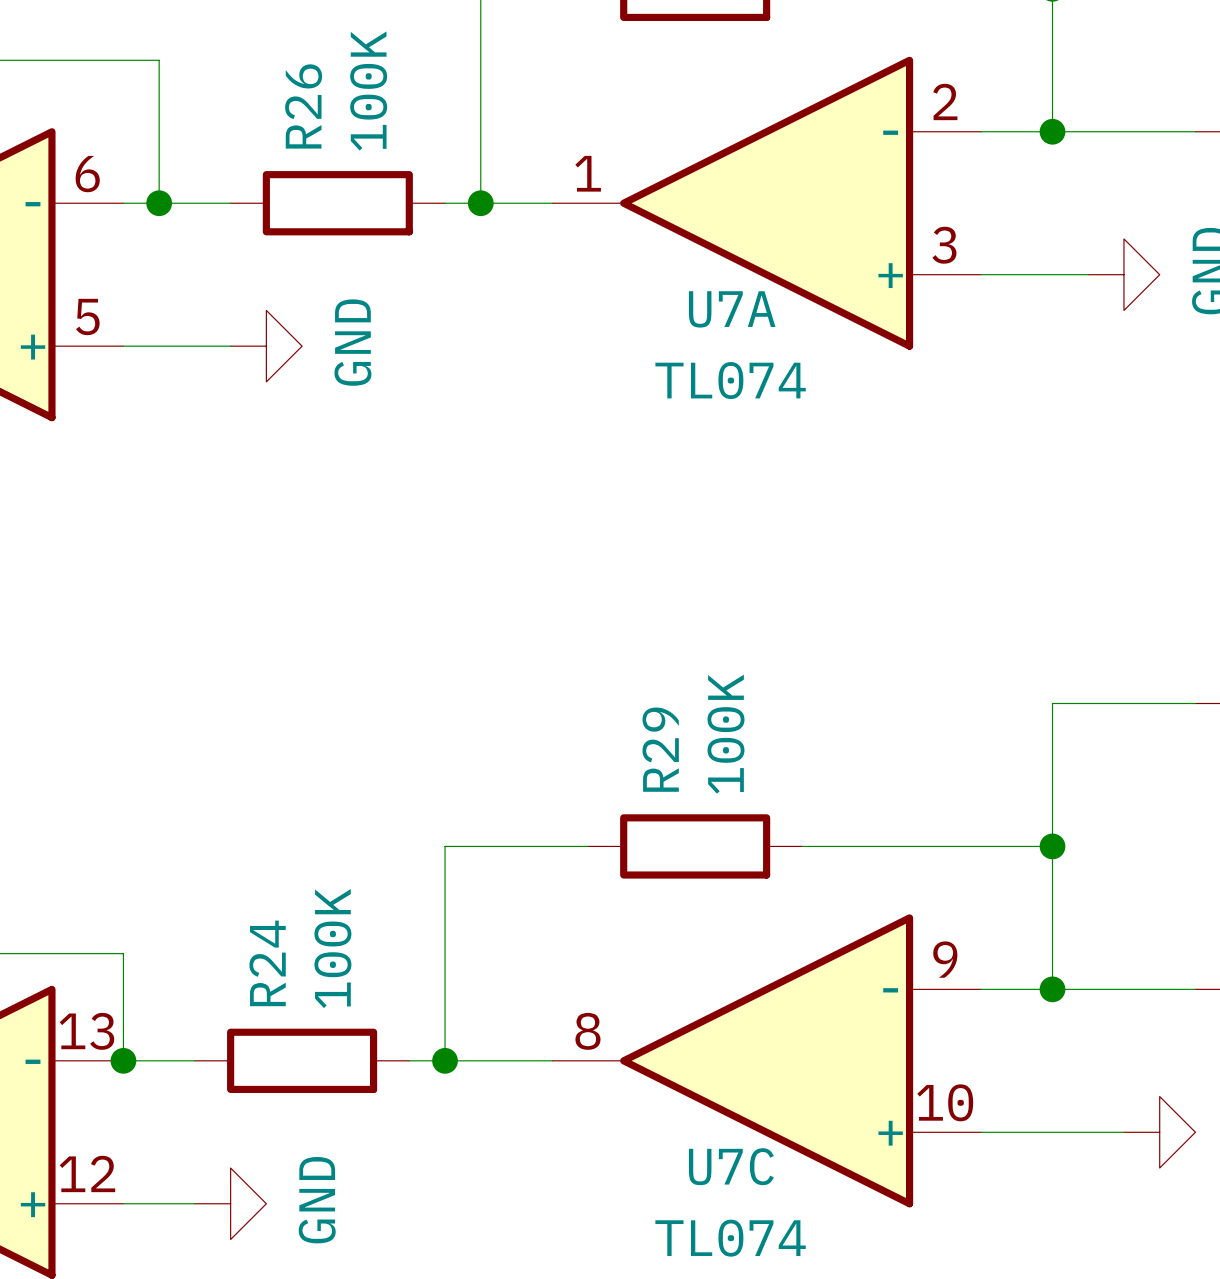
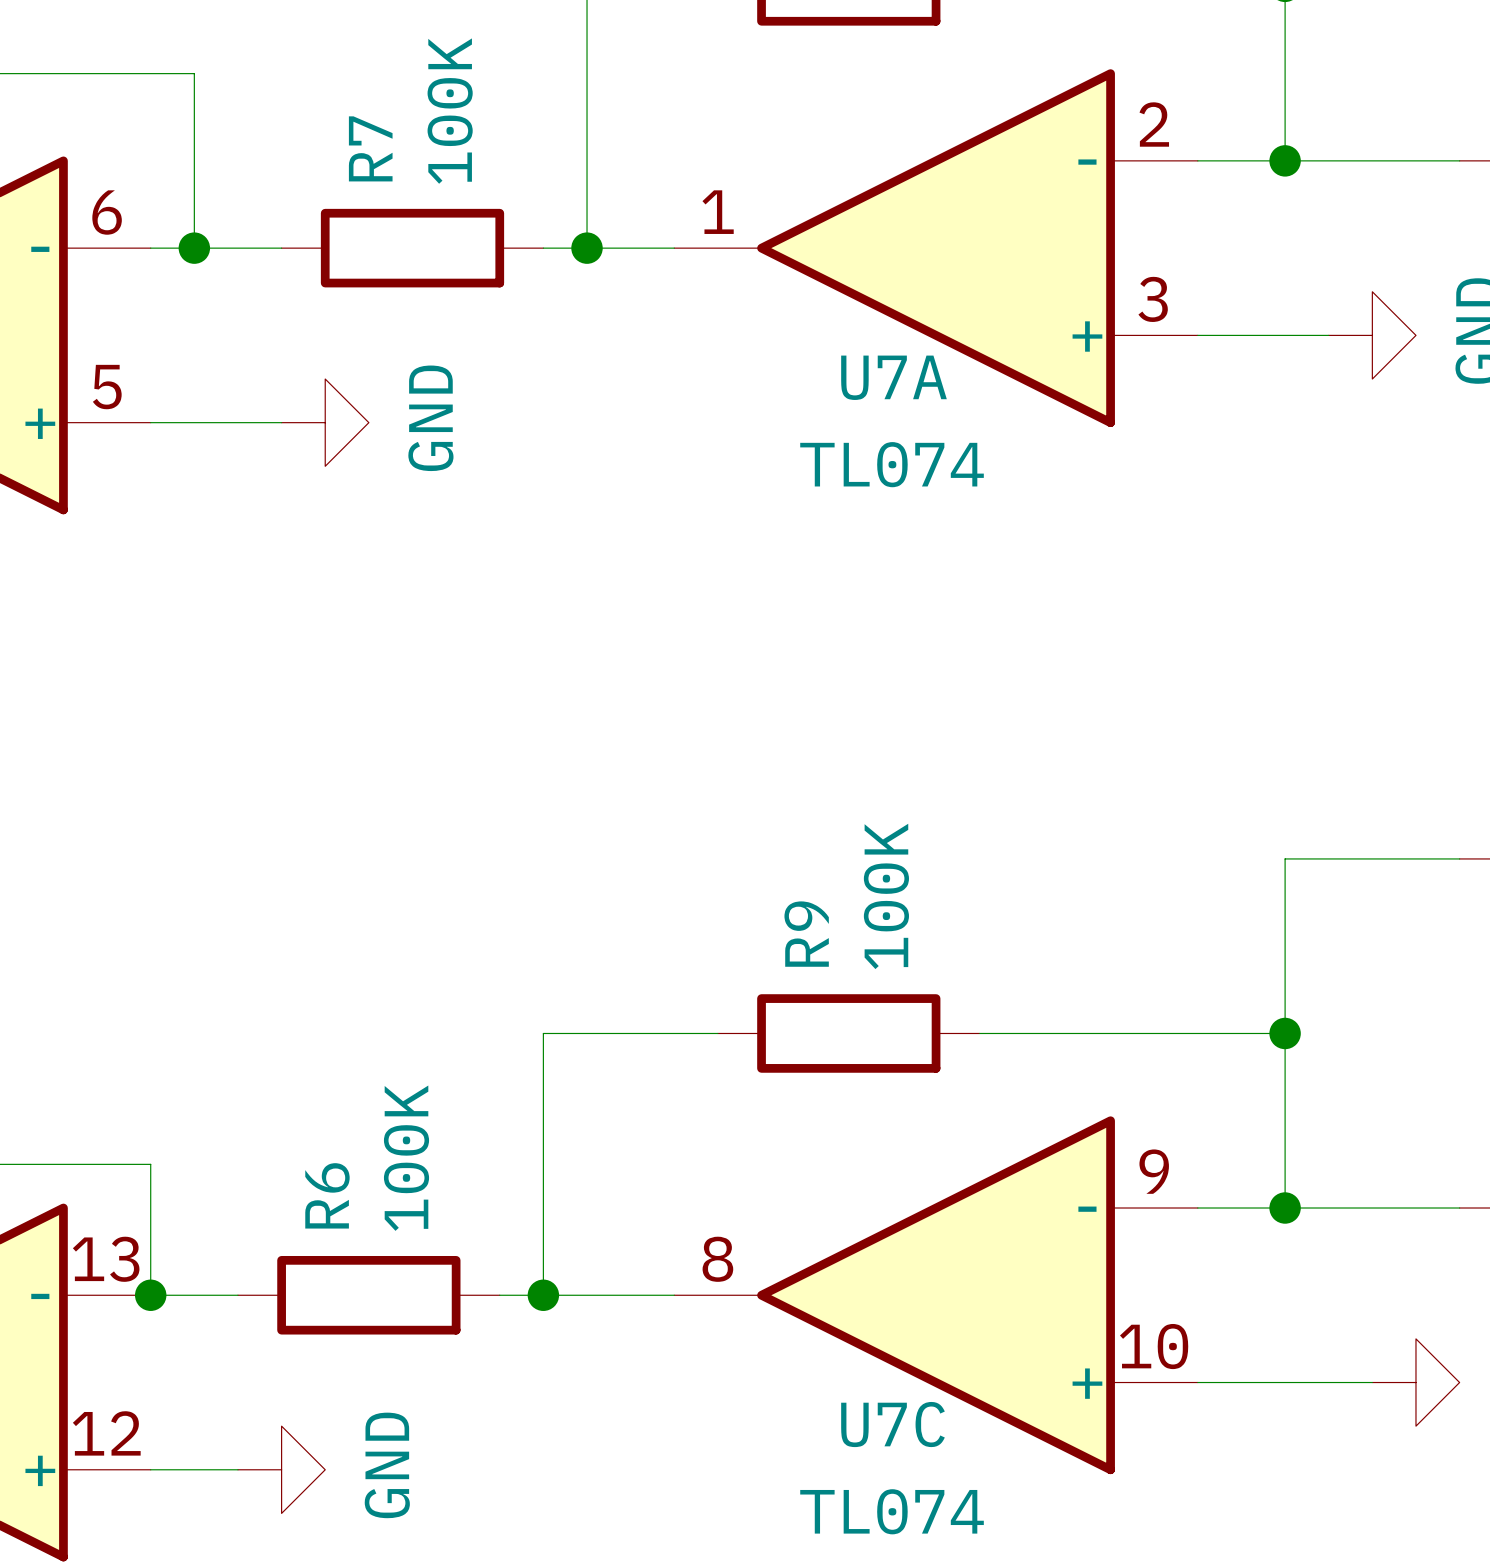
R26 name: R26 (303, 106) -> R7 (370, 148)
R29 name: R29 (660, 749) -> R9 (806, 934)
R24 name: R24 (267, 963) -> R6 (327, 1195)

